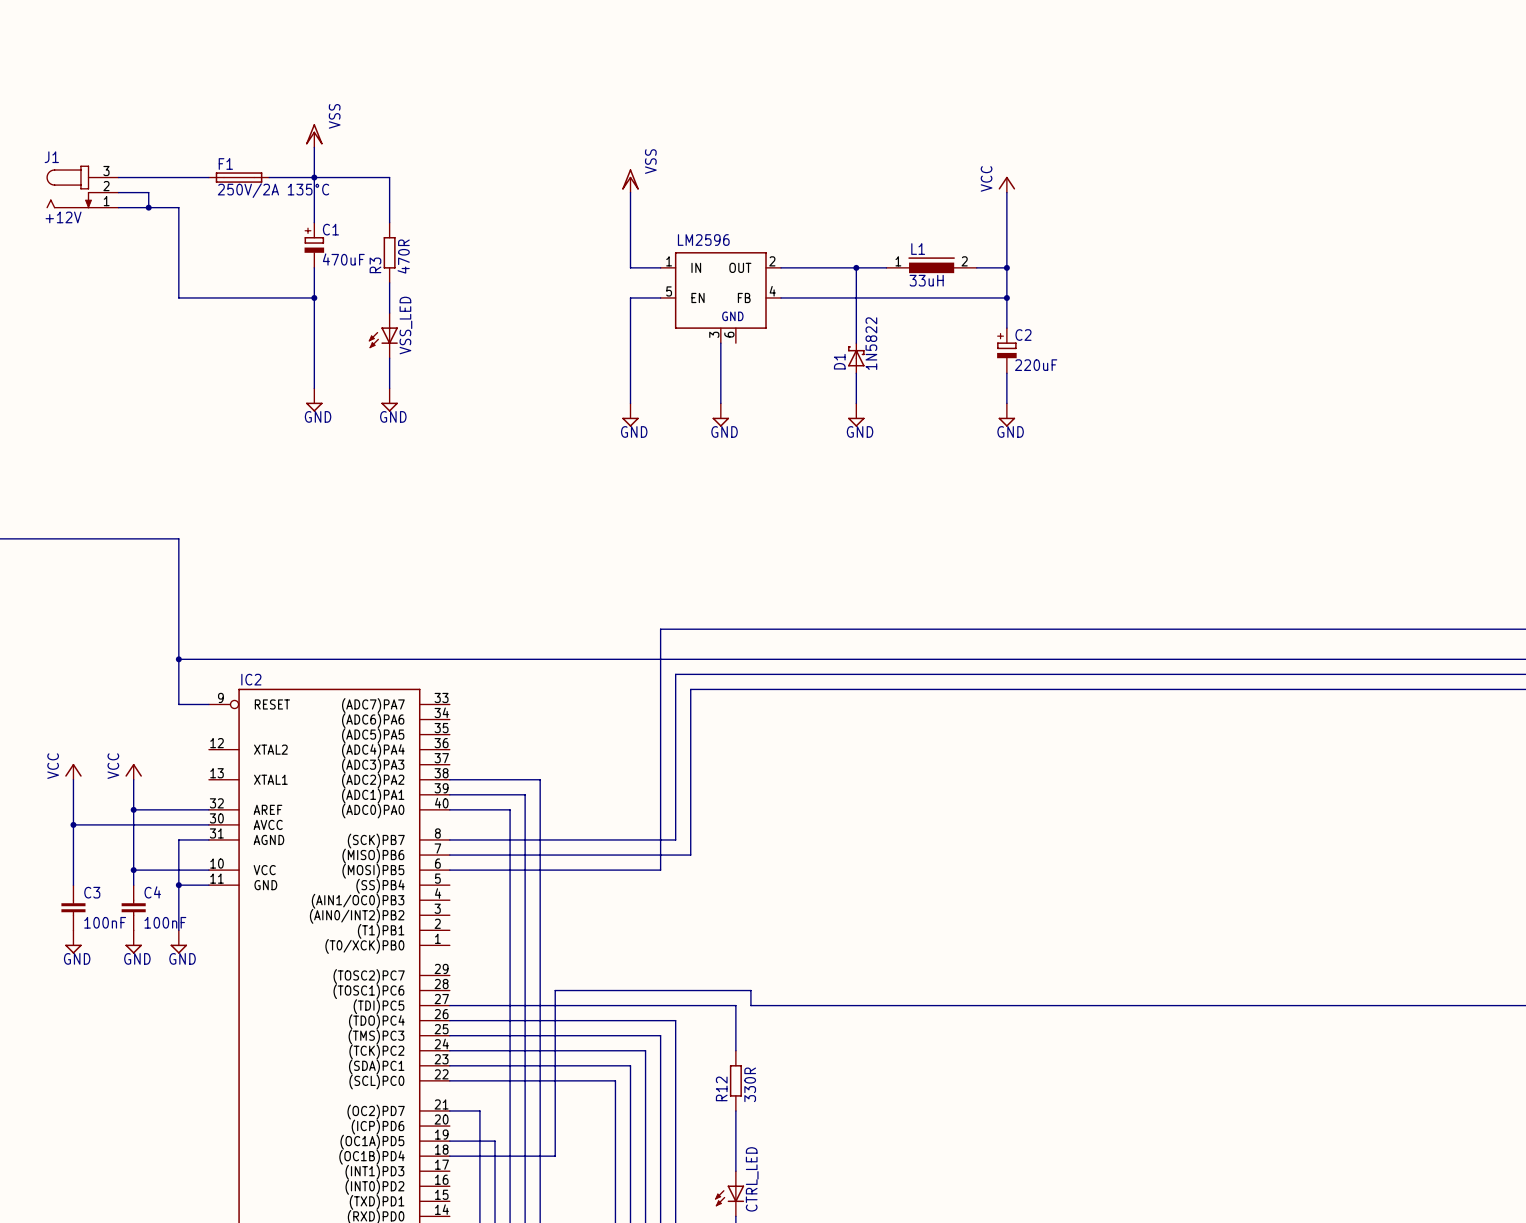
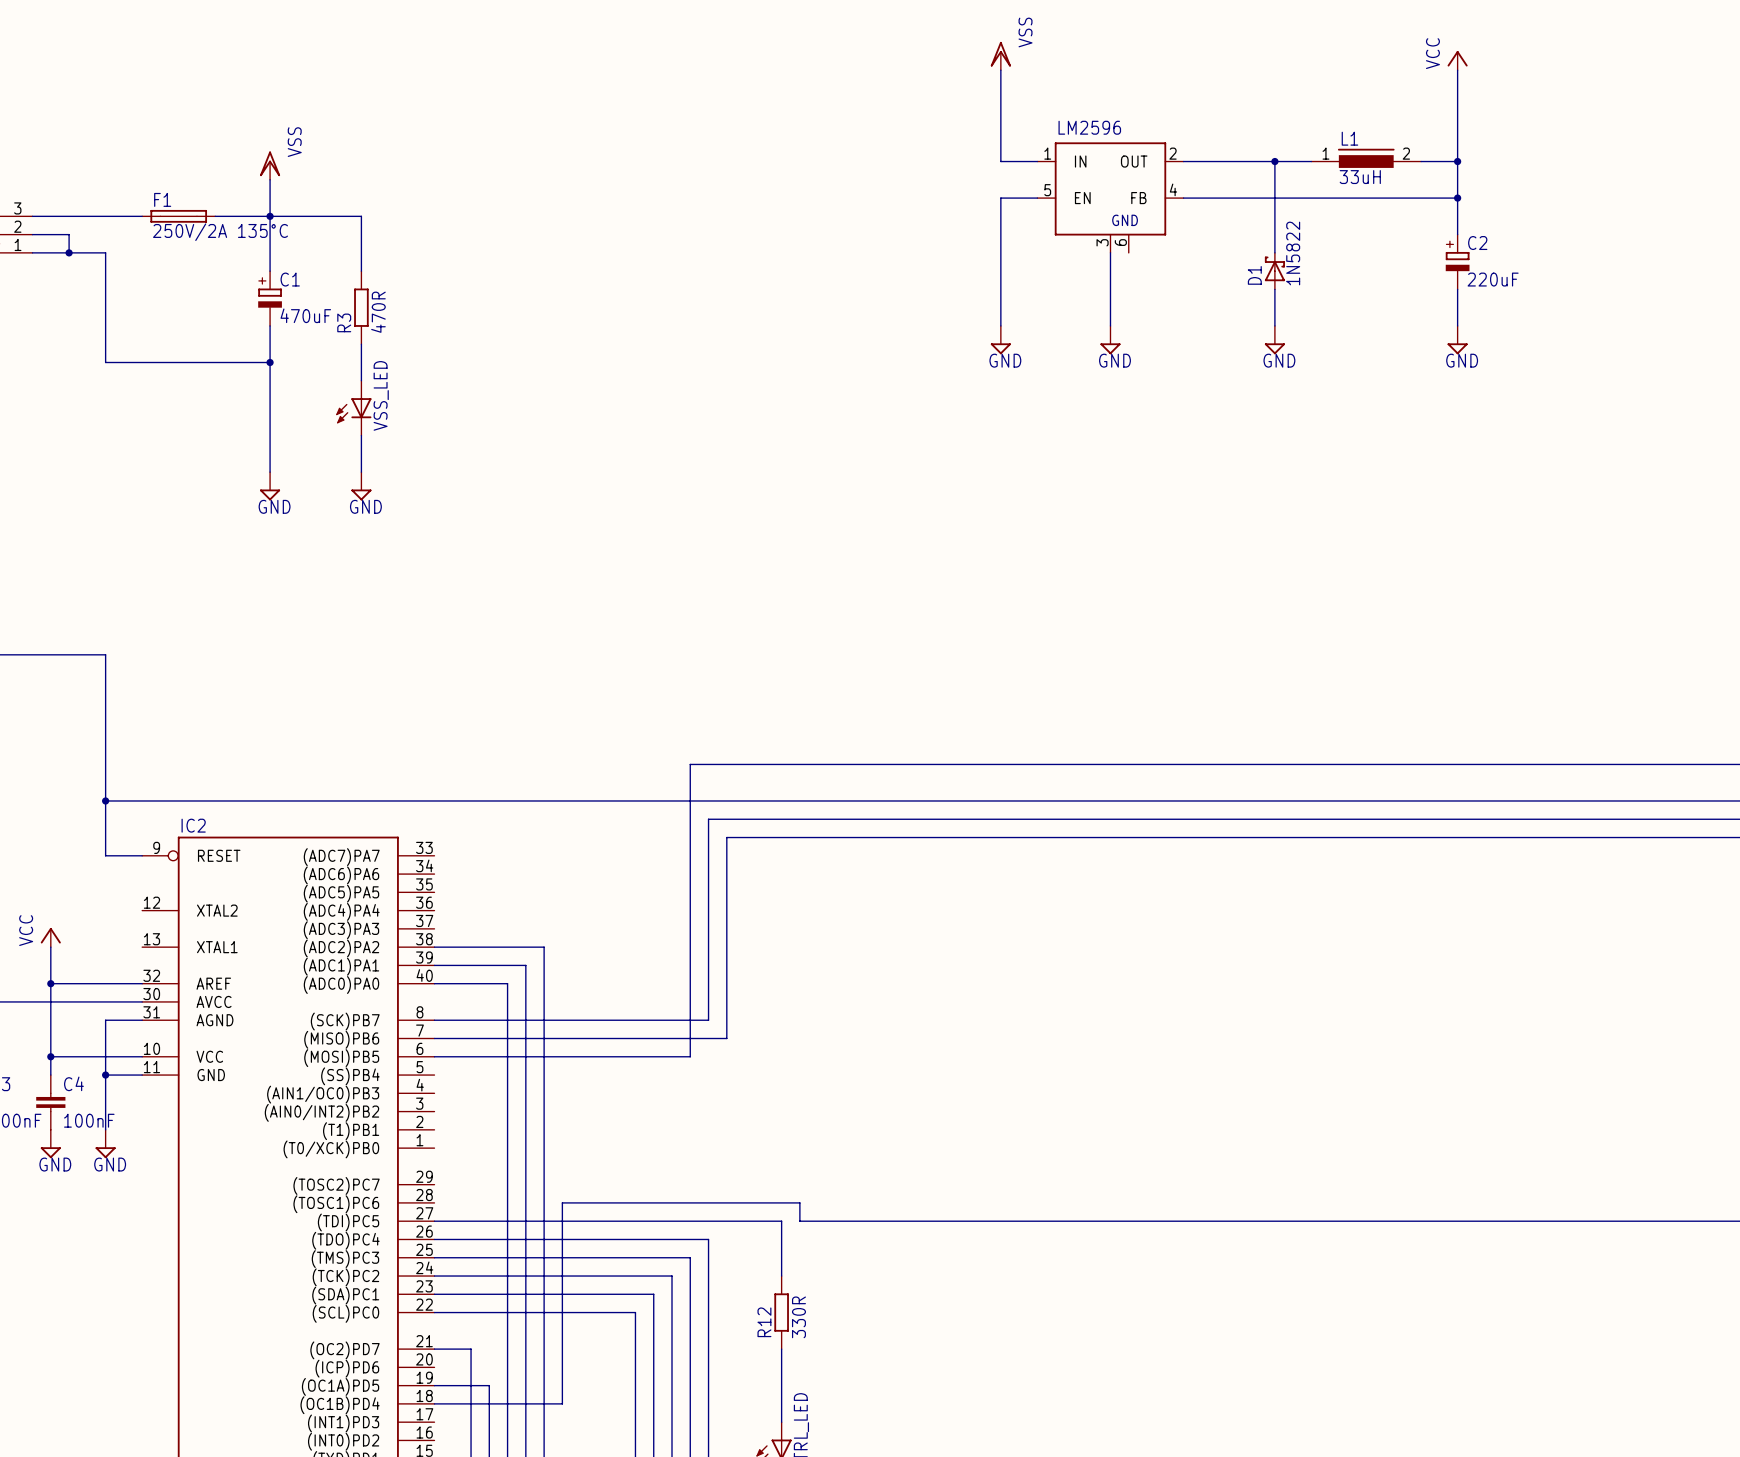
power symbol: none -> VSS (1000, 56)
power symbol: none -> VCC (1457, 60)
wire: none -> (1000, 70) (1000, 161) (1037, 161)
wire: none -> (1457, 70) (1457, 234)
wire: none -> (1183, 161) (1311, 161)
wire: none -> (1274, 161) (1274, 252)
junction: none -> (1274, 161)
wire: none -> (1421, 161) (1457, 161)
junction: none -> (1457, 161)
wire: none -> (1037, 198) (1000, 198) (1000, 325)
wire: none -> (1183, 198) (1457, 198)
junction: none -> (1457, 198)
power symbol: VSS (630, 180) -> none
power symbol: VCC (1006, 184) -> none
wire: (630, 192) (630, 267) (660, 267) -> none
wire: none -> (1274, 289) (1274, 325)
wire: none -> (1457, 289) (1457, 325)
L1 position: (931, 265) -> (1366, 158)
wire: (781, 267) (886, 267) -> none
wire: (856, 267) (856, 343) -> none
junction: (856, 267) -> none
wire: (976, 267) (1006, 267) (1006, 328) -> none
junction: (1006, 267) -> none
power symbol: none -> GND (1000, 340)
power symbol: none -> GND (1110, 340)
power symbol: none -> GND (1274, 340)
power symbol: none -> GND (1457, 340)
wire: (660, 297) (630, 297) (630, 403) -> none
LM2596 position: (720, 297) -> (1110, 197)
wire: (781, 297) (1006, 297) -> none
junction: (1006, 297) -> none
wire: (720, 343) (720, 403) -> none
C2 position: (1006, 350) -> (1457, 262)
D1 position: (856, 358) -> (1274, 271)
wire: (856, 373) (856, 403) -> none
wire: (1006, 373) (1006, 403) -> none
power symbol: GND (630, 415) -> none
power symbol: GND (720, 415) -> none
power symbol: GND (856, 415) -> none
power symbol: GND (1006, 415) -> none

